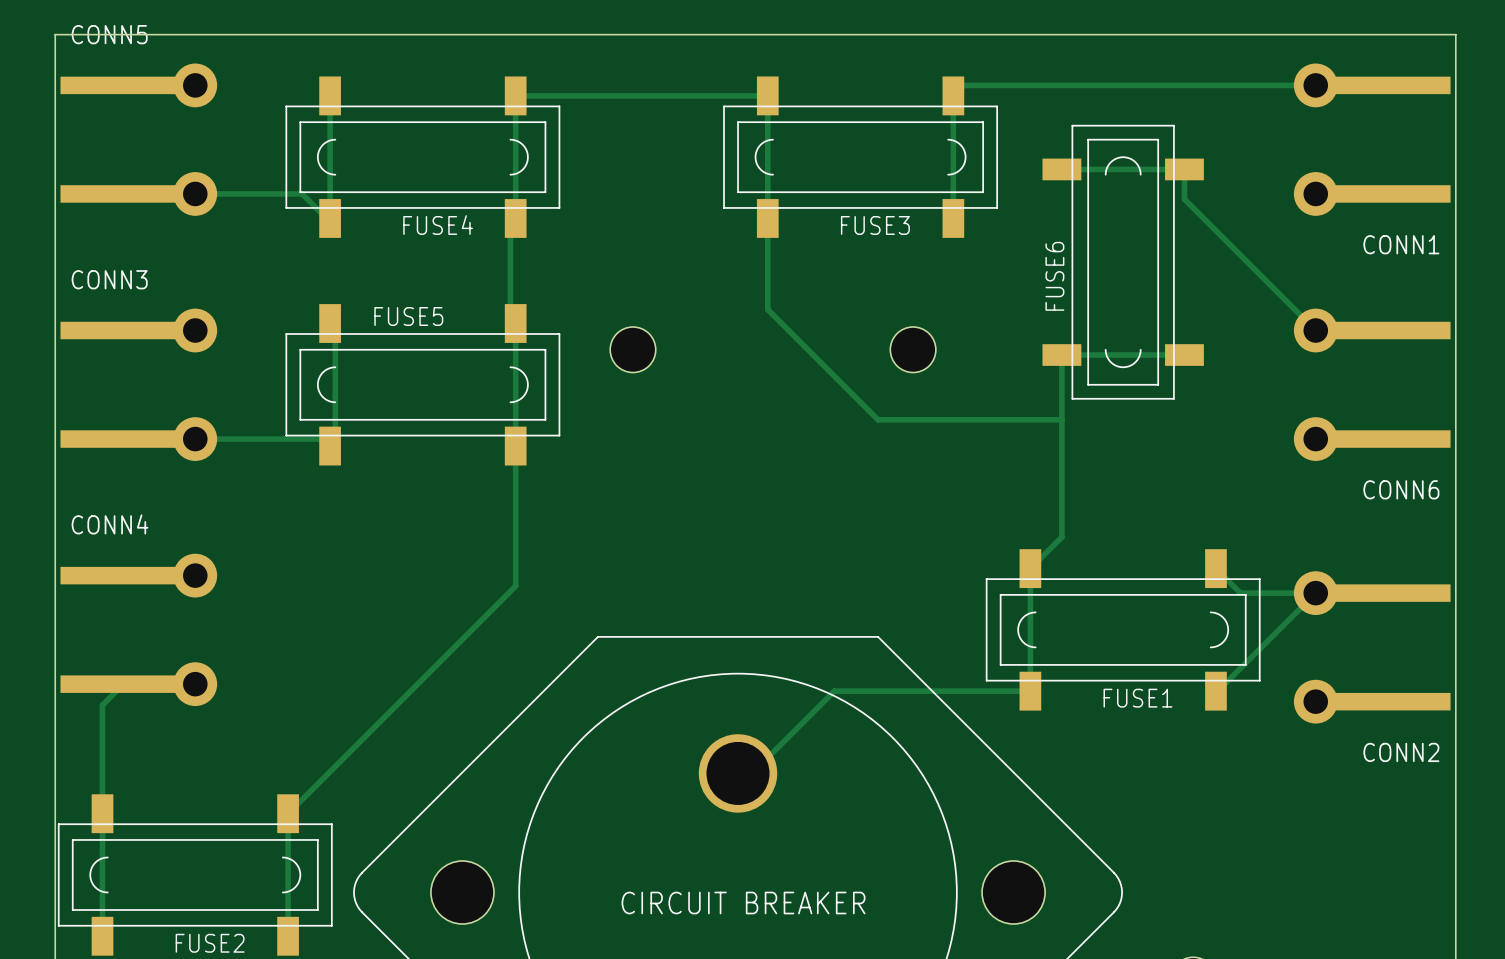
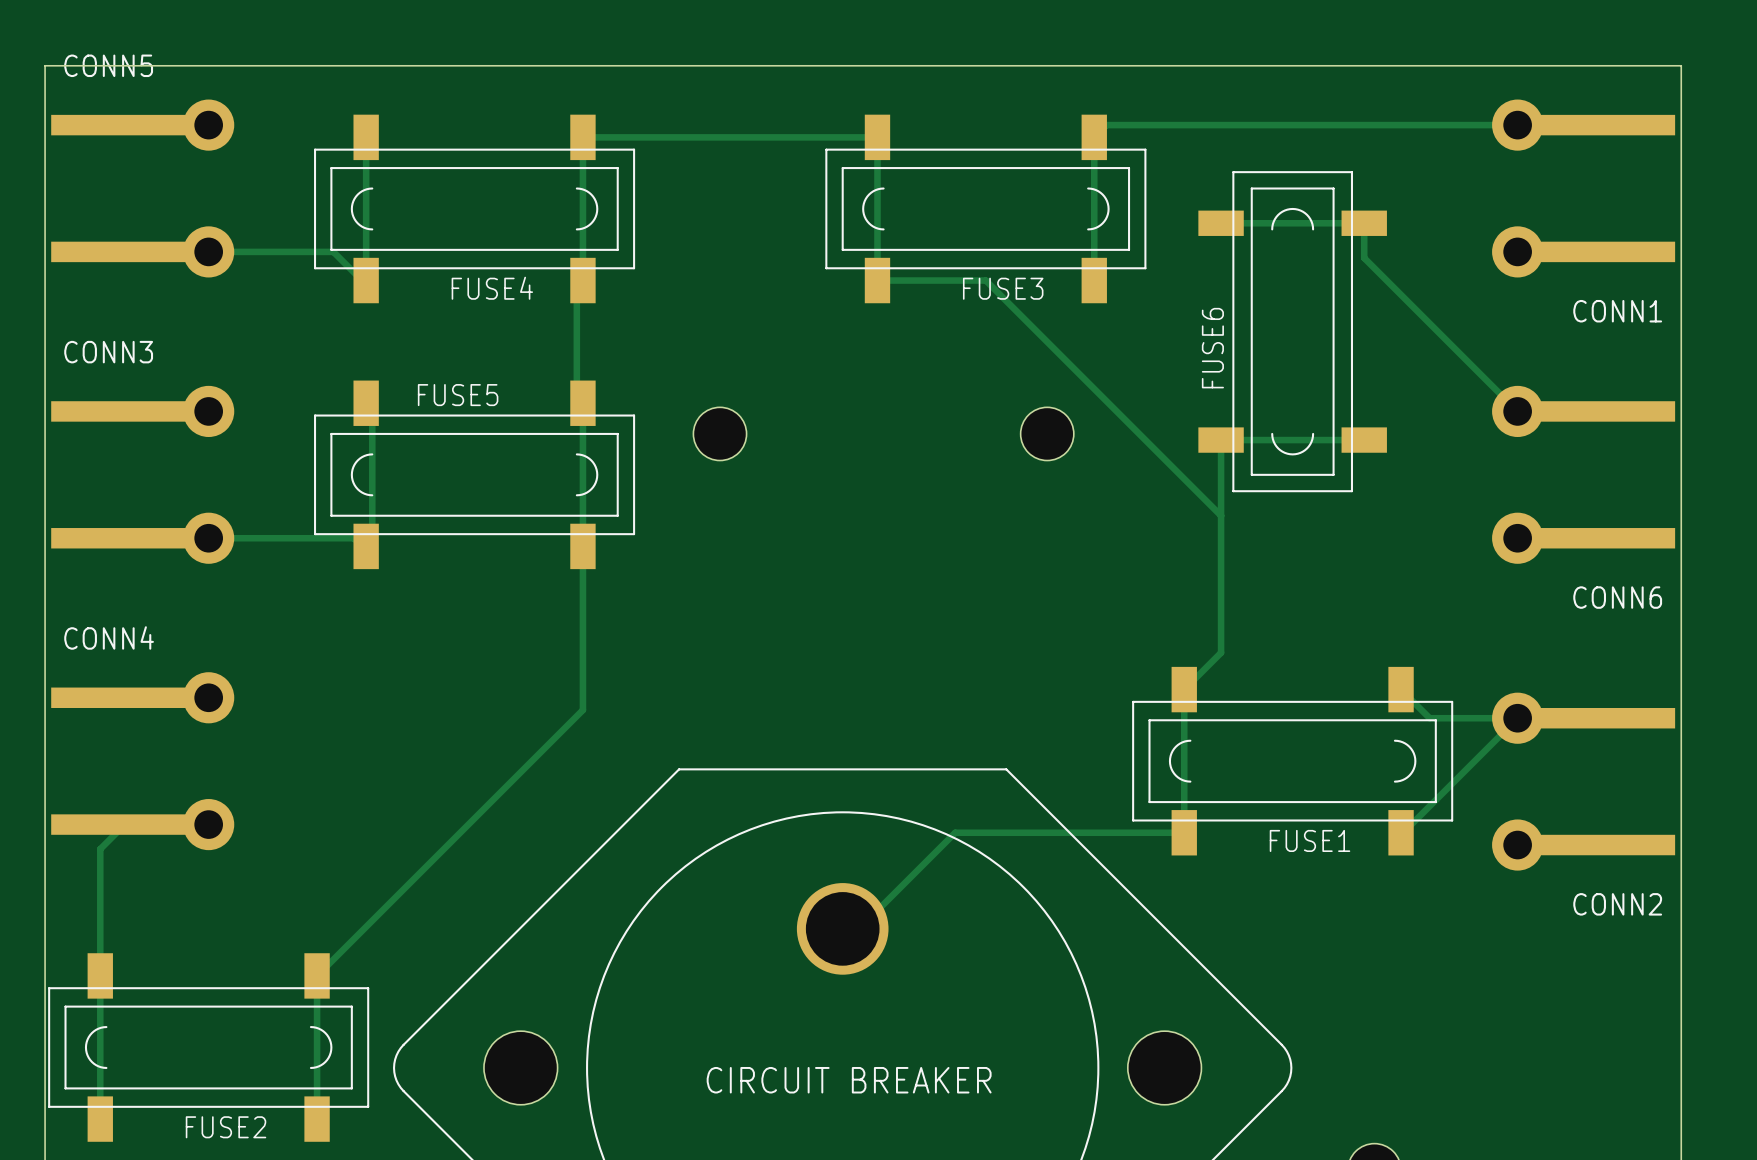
track: (767, 218) (767, 309) (878, 419) (1061, 419) -> (877, 280) (985, 280) (1221, 515)

